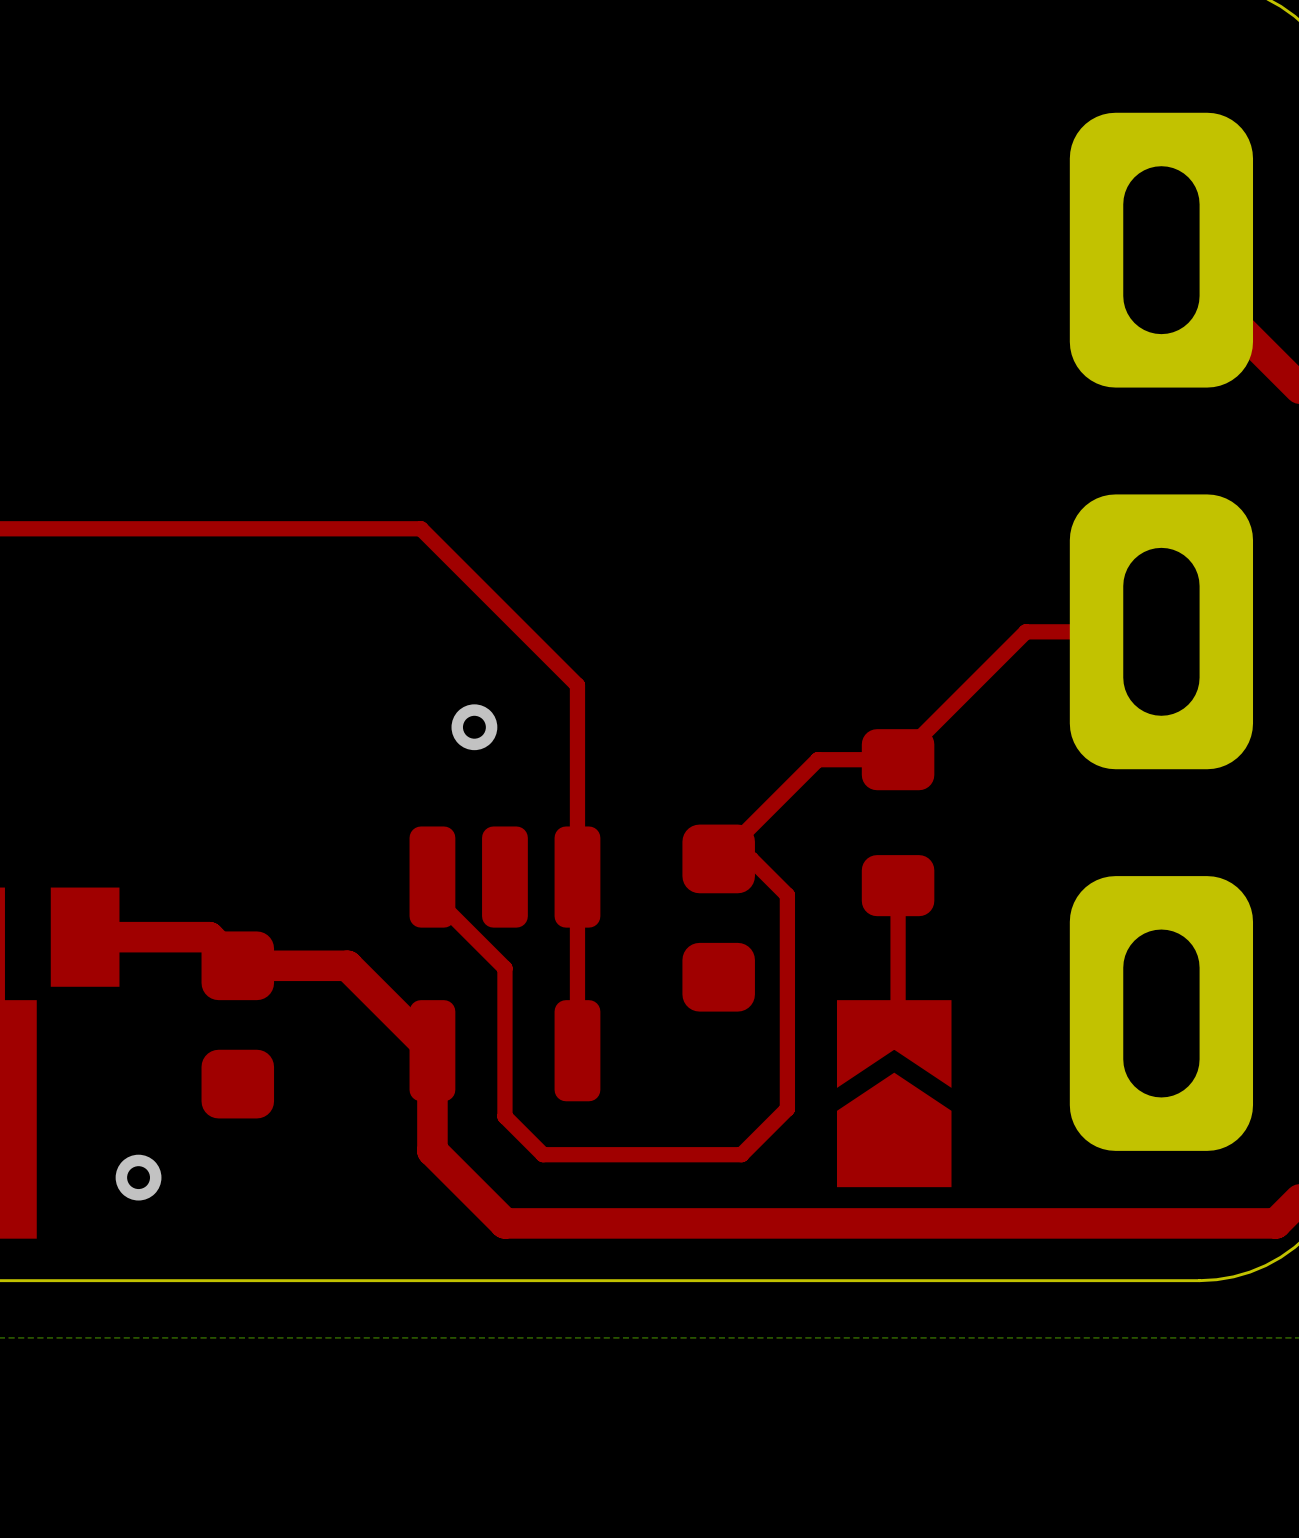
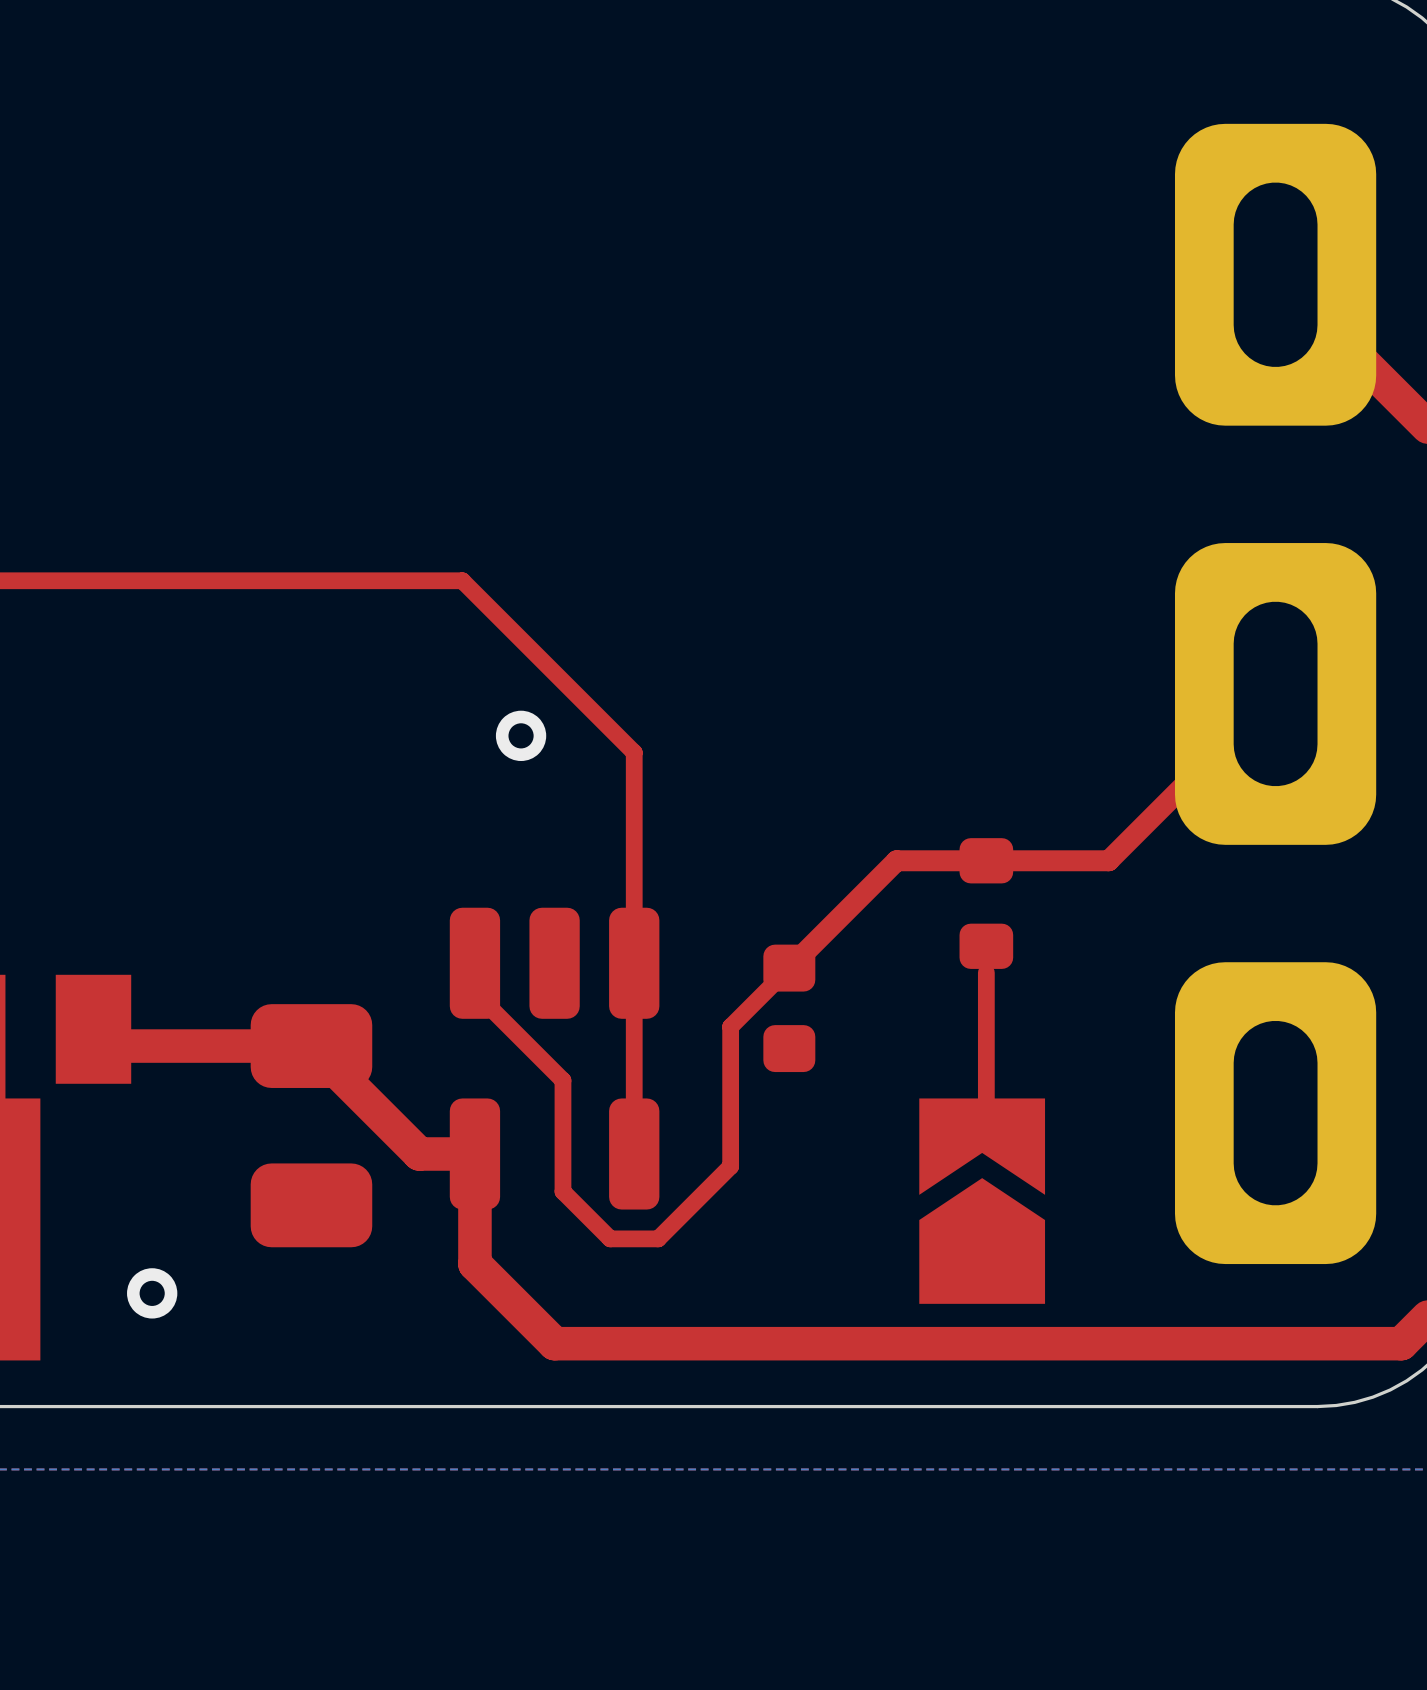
top track: (1161, 631) (1025, 631) (898, 759) (817, 759) (718, 858) (751, 858) (787, 895) (787, 1108) (741, 1154) (543, 1154) (504, 1116) (504, 968) (432, 895) -> (1275, 693) (1108, 860) (896, 860) (730, 1026) (730, 1166) (658, 1238) (610, 1238) (562, 1191) (562, 1080) (474, 992) (474, 983)
via position: (474, 727) -> (521, 735)
part footprint: [861, 729, 935, 917] -> [959, 838, 1014, 969]
part footprint: [682, 824, 755, 1012] -> [763, 944, 816, 1073]
part footprint: [201, 931, 275, 1119] -> [250, 1004, 373, 1248]
top track: (85, 937) (209, 937) (237, 965) (347, 965) (432, 1050) -> (93, 1029) (110, 1046) (311, 1046) (419, 1154) (474, 1154)

